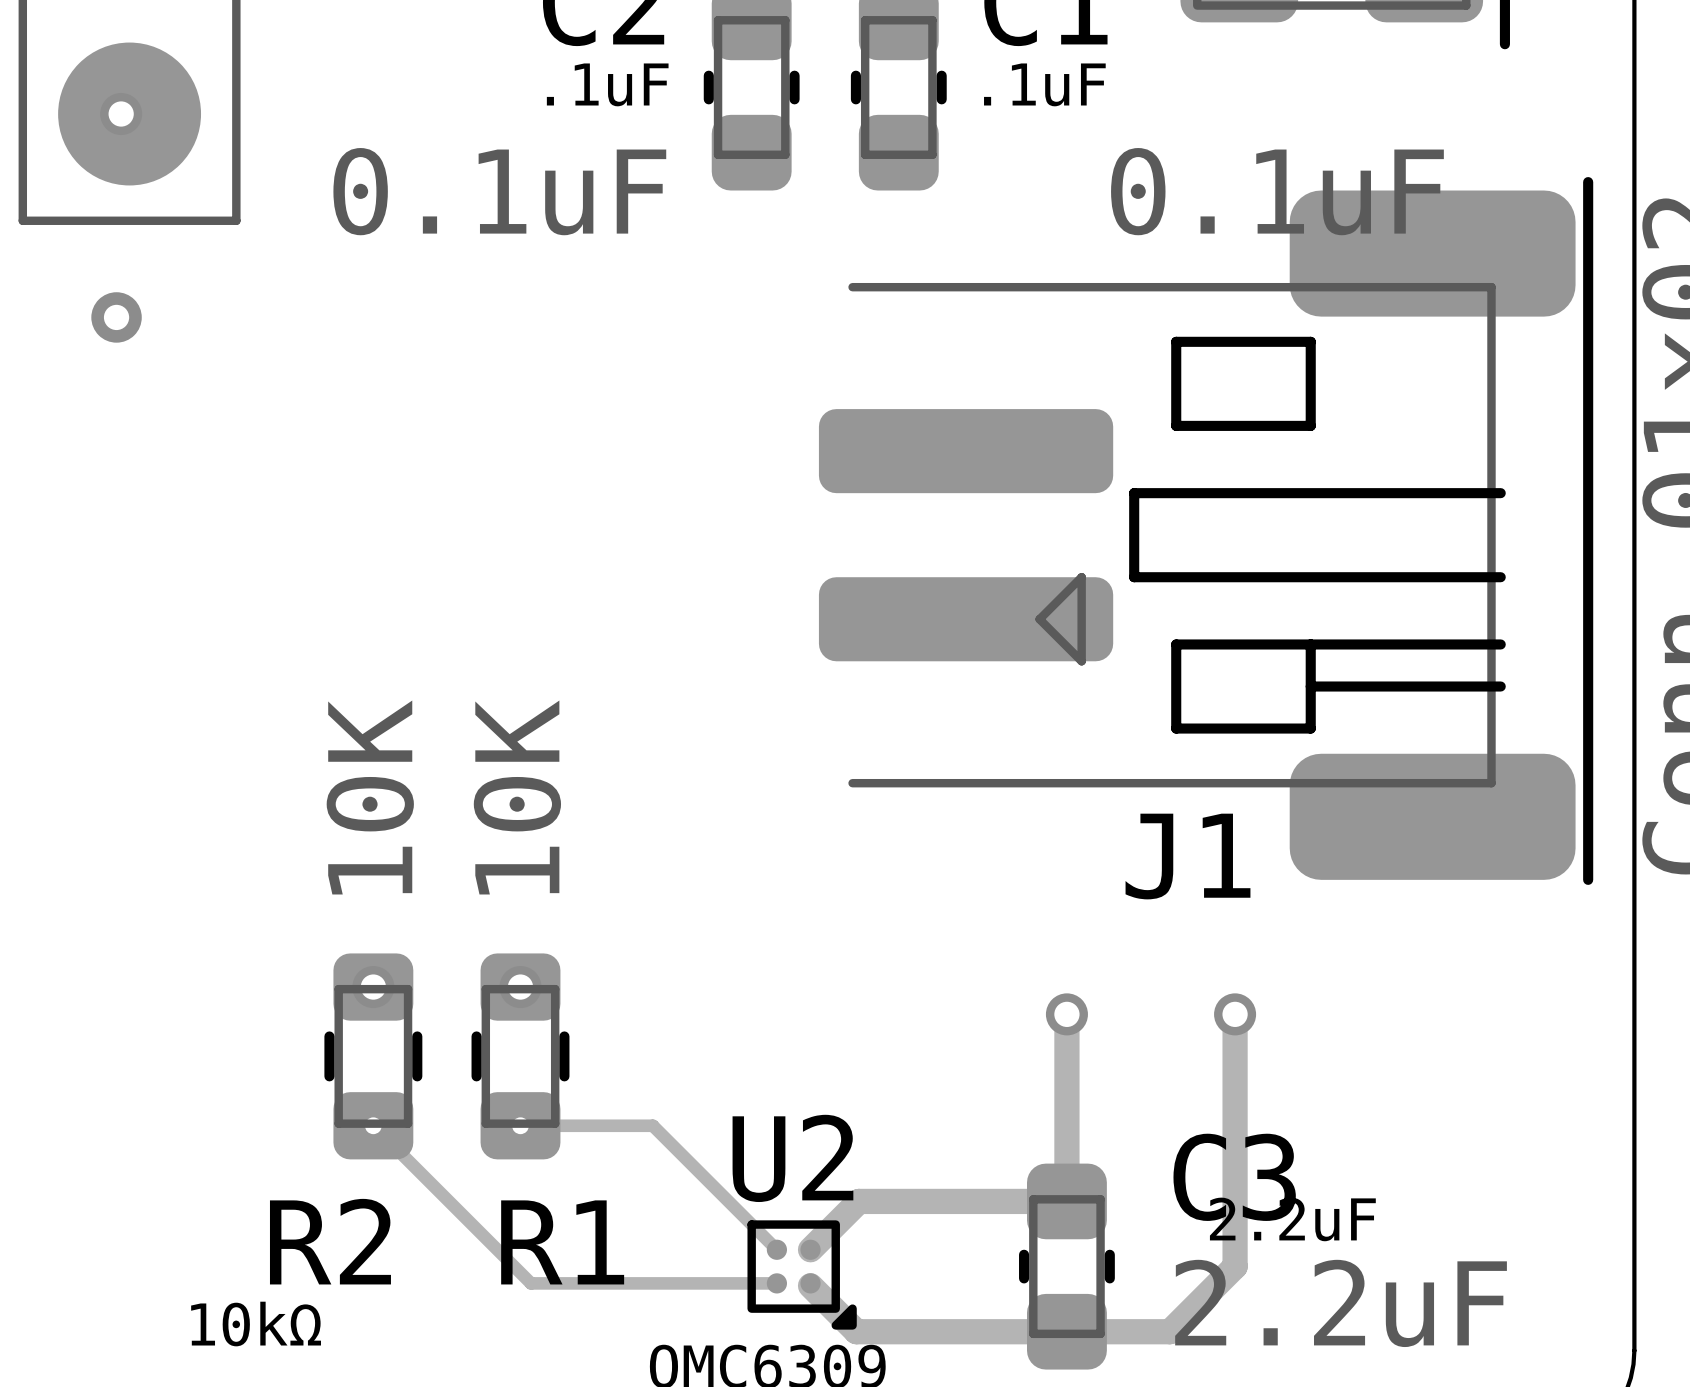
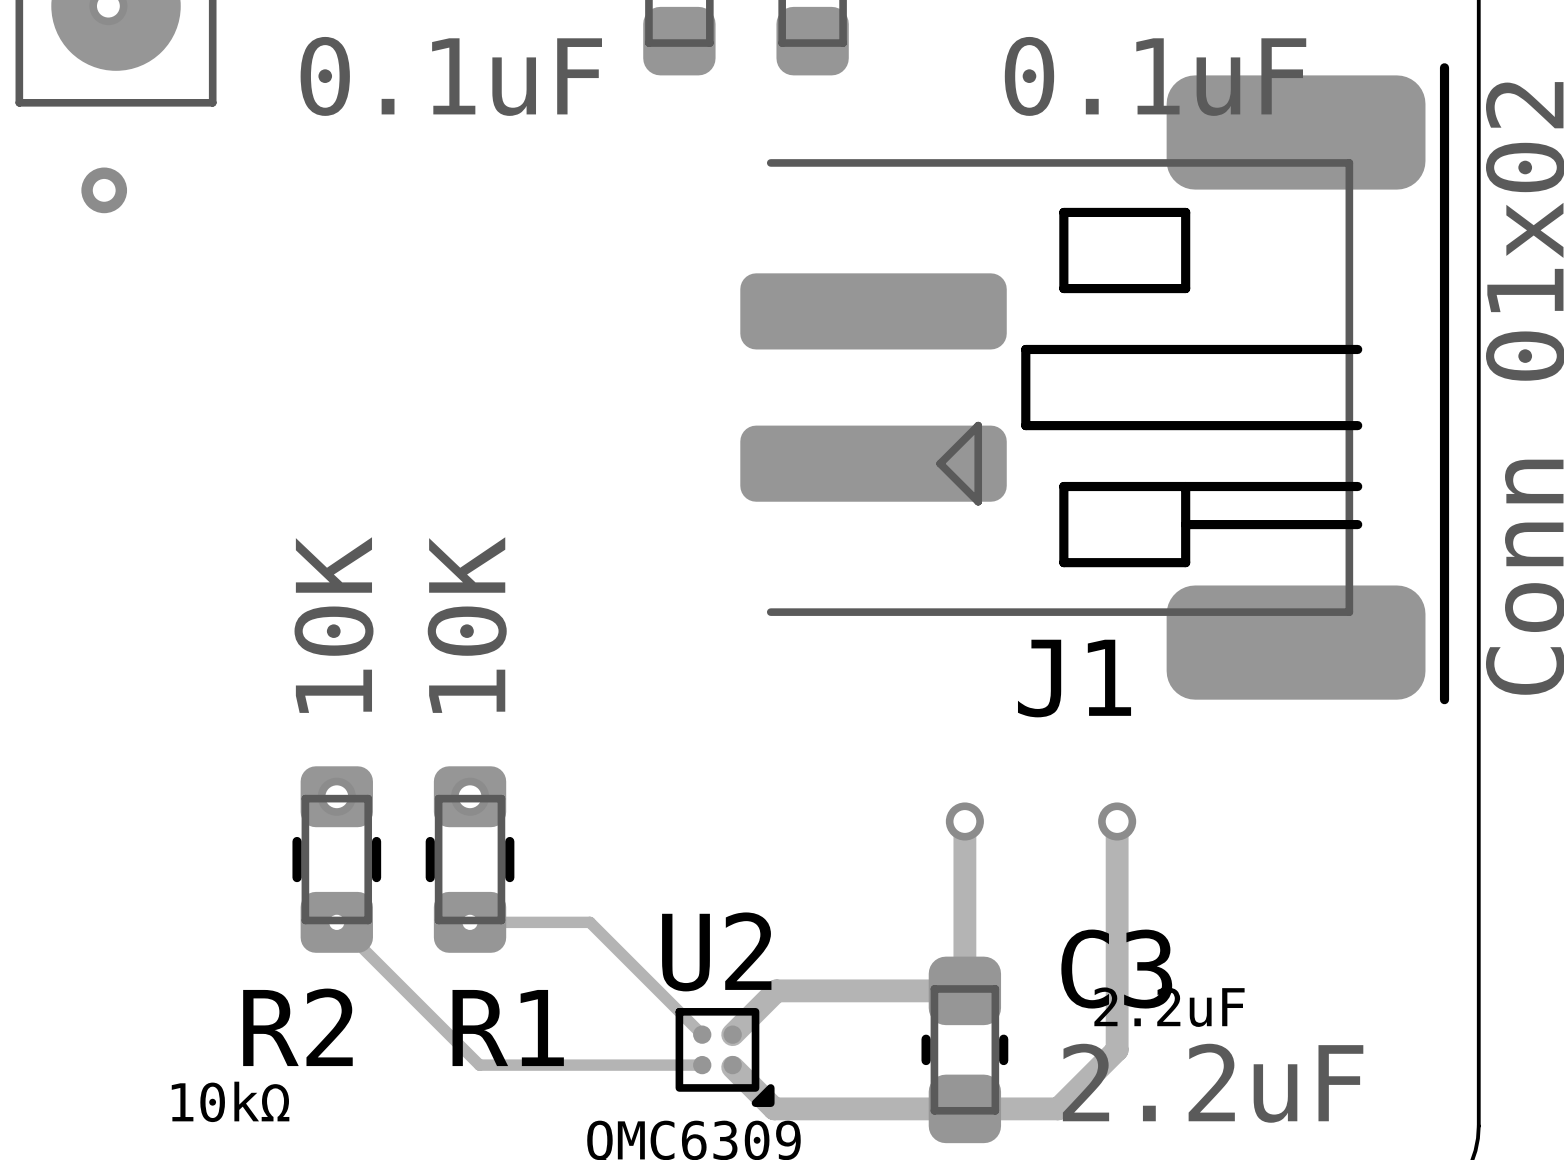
J1 footprint: [818, 177, 1594, 885] -> [740, 63, 1450, 705]

